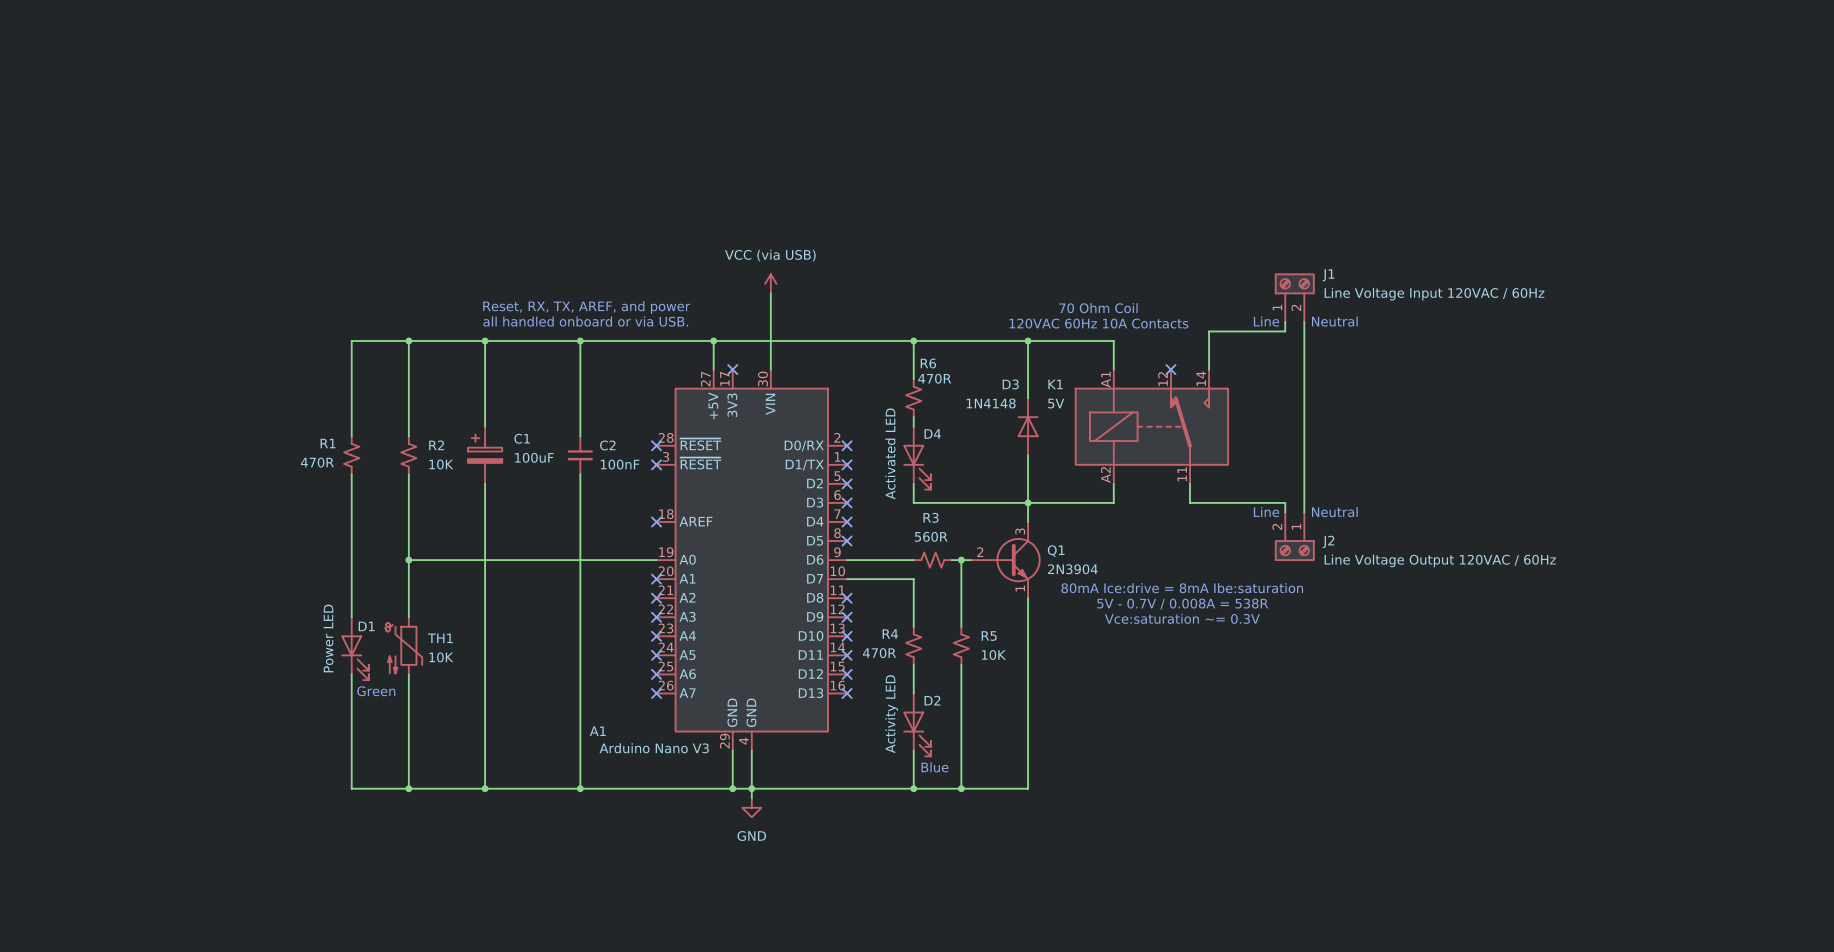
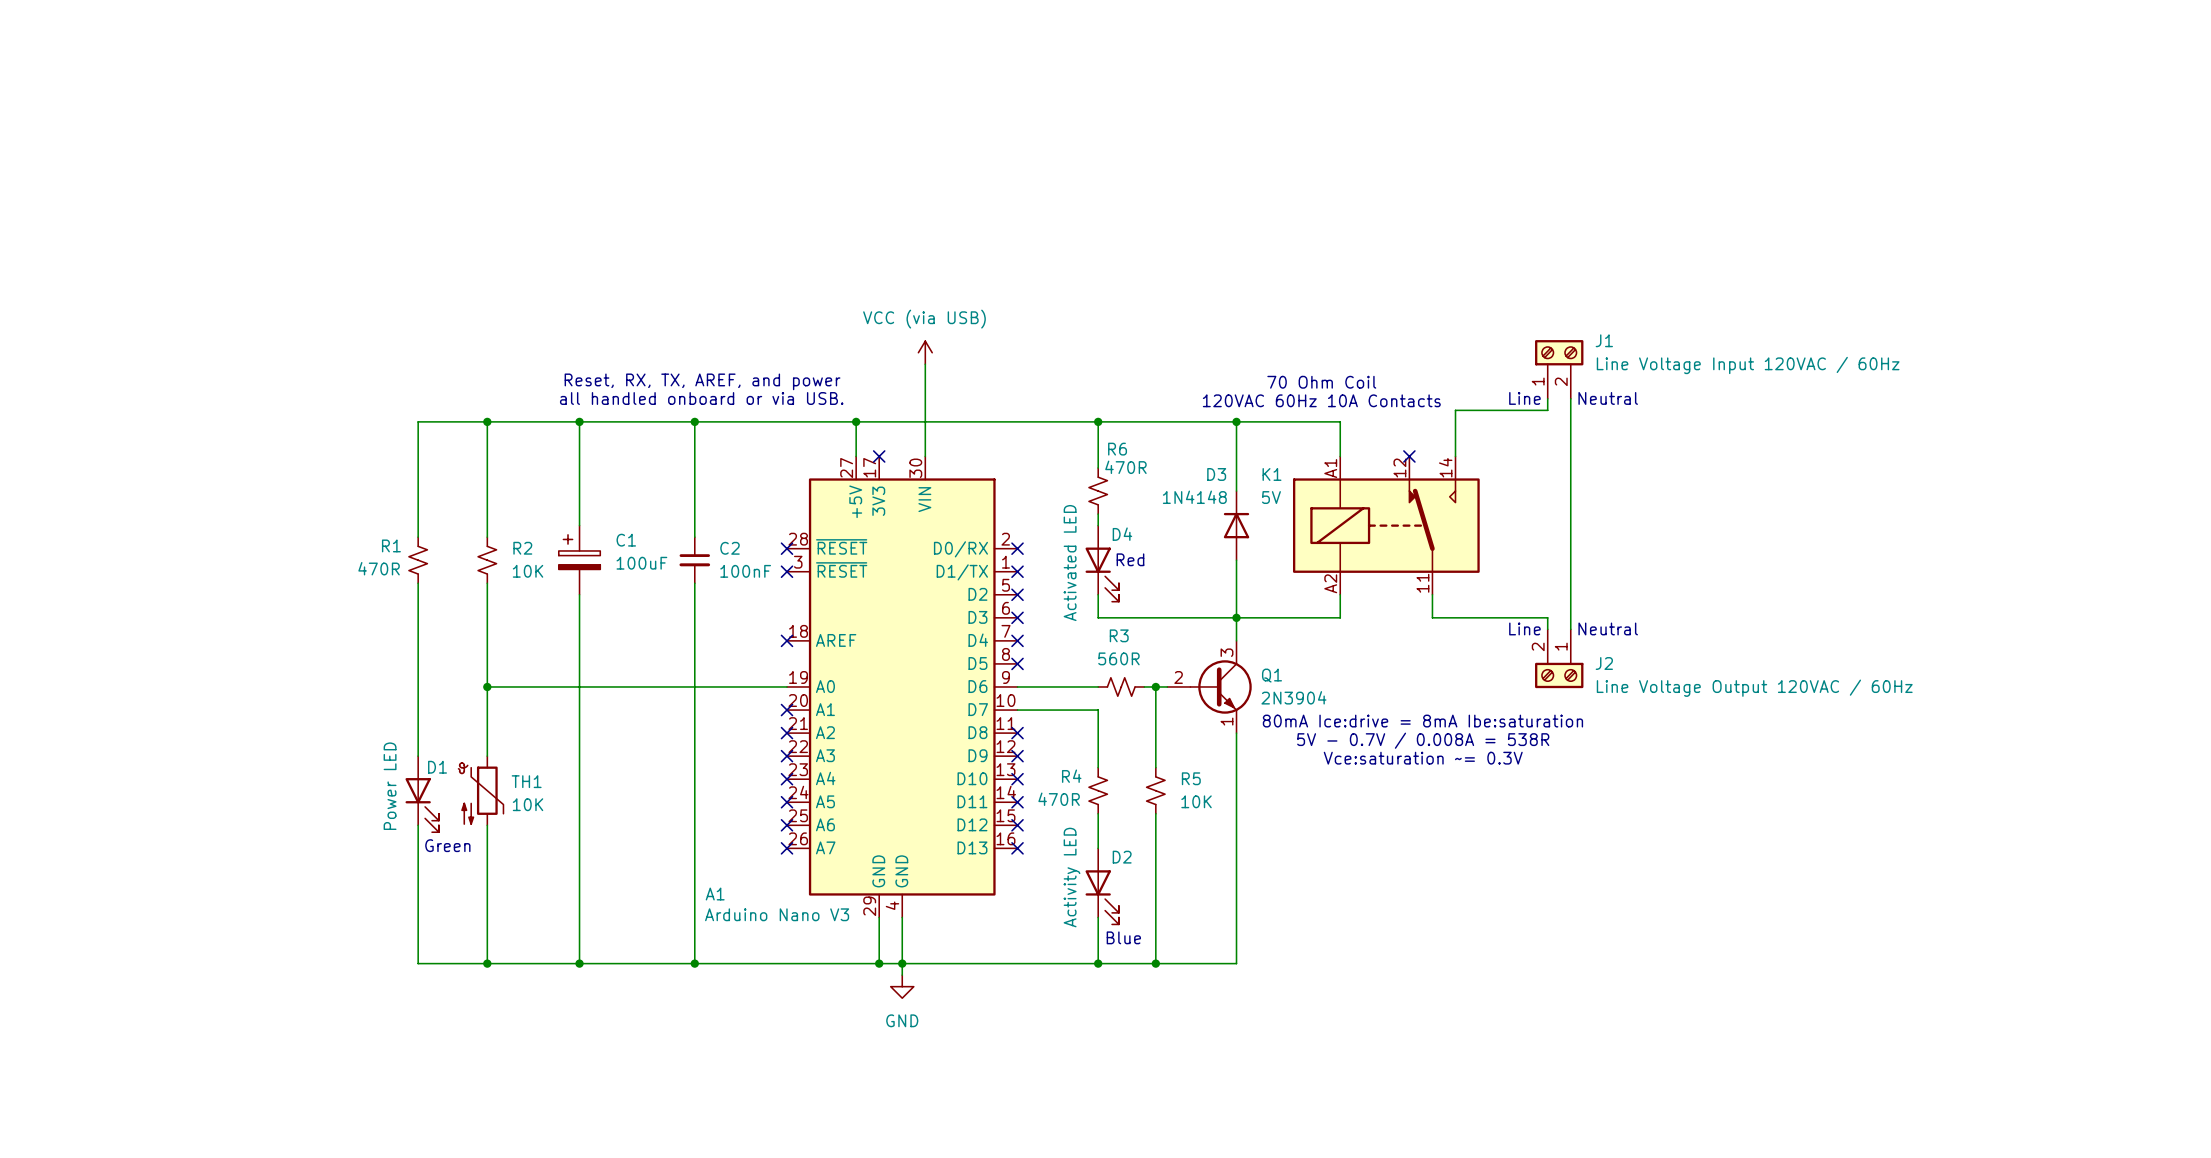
text: none -> Red (1130, 559)

